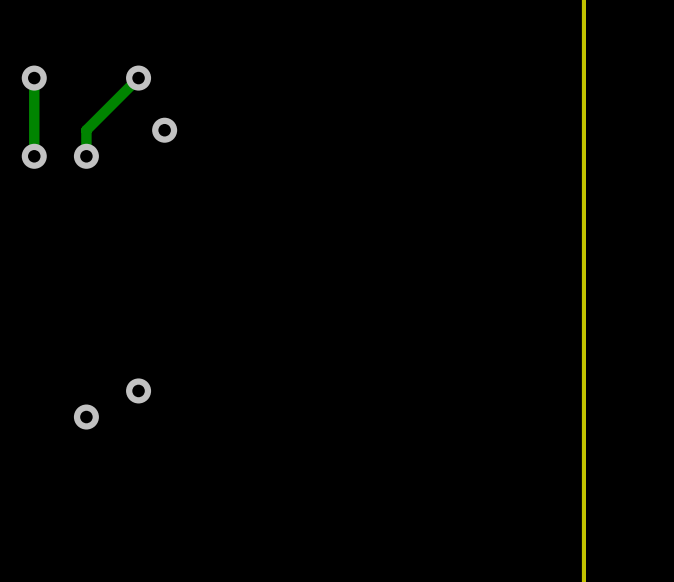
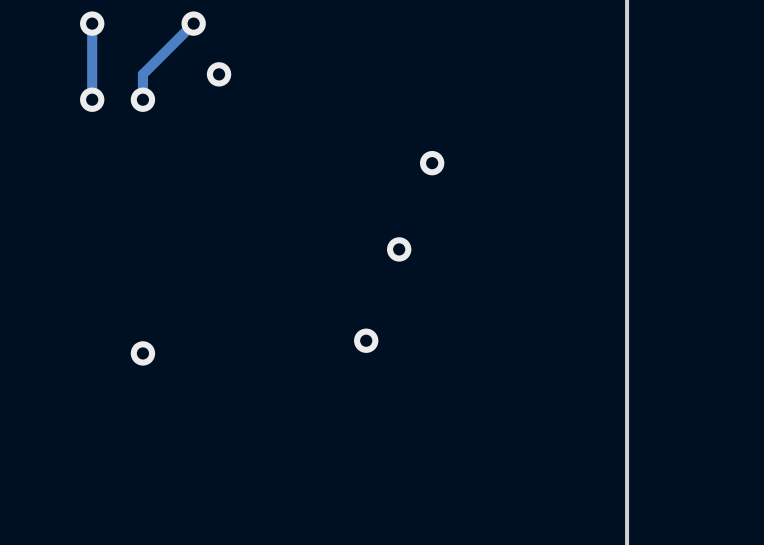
via: none -> (432, 163)
via: none -> (399, 249)
via: (138, 390) -> none
via: none -> (366, 340)

